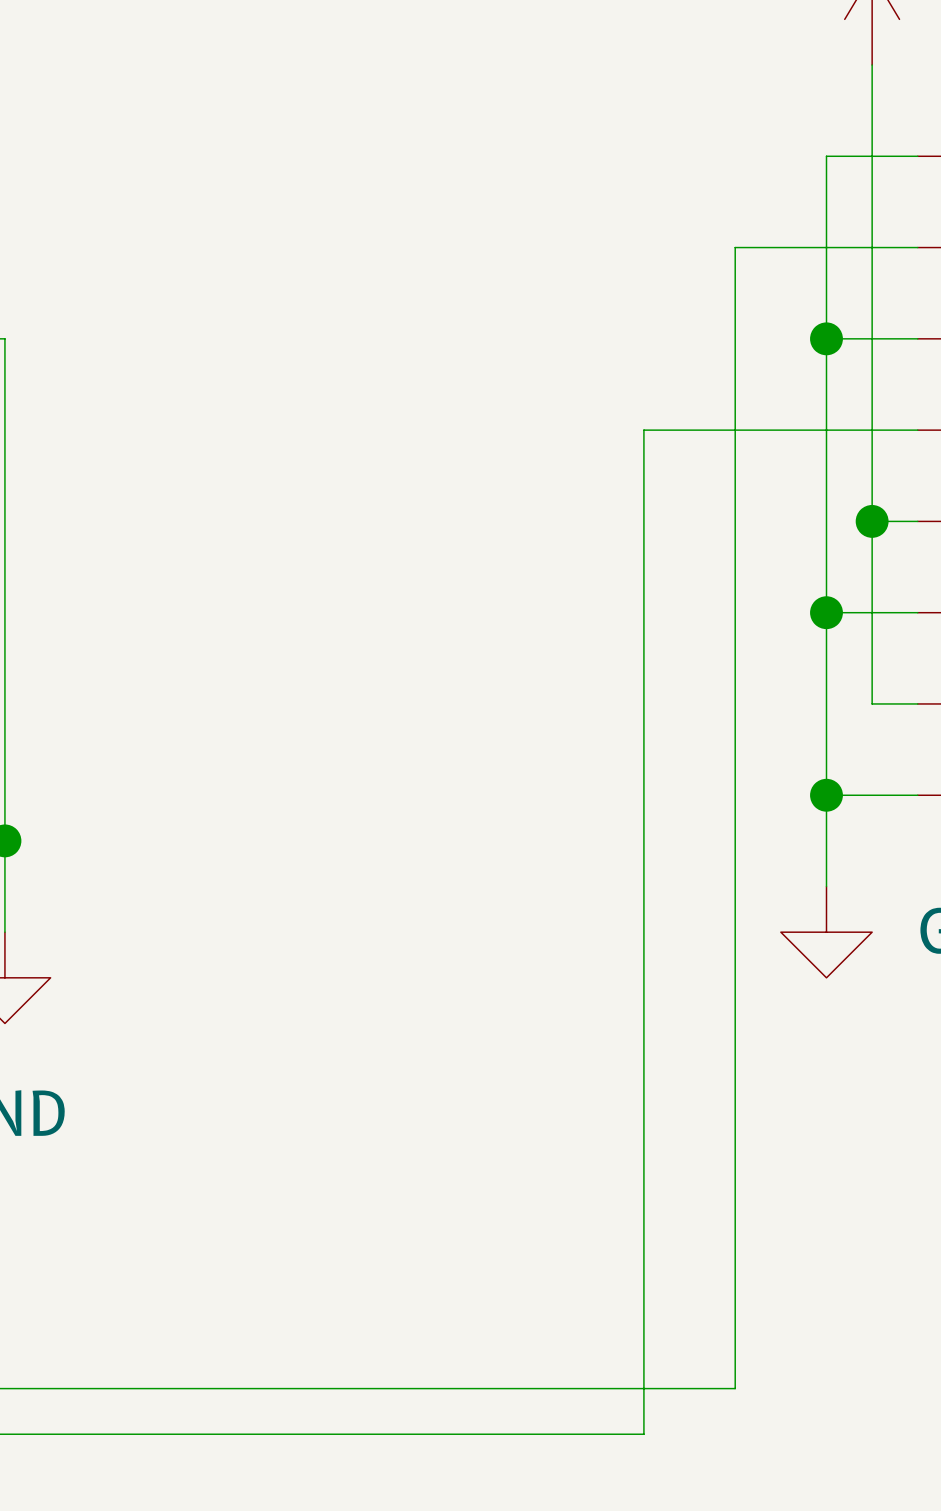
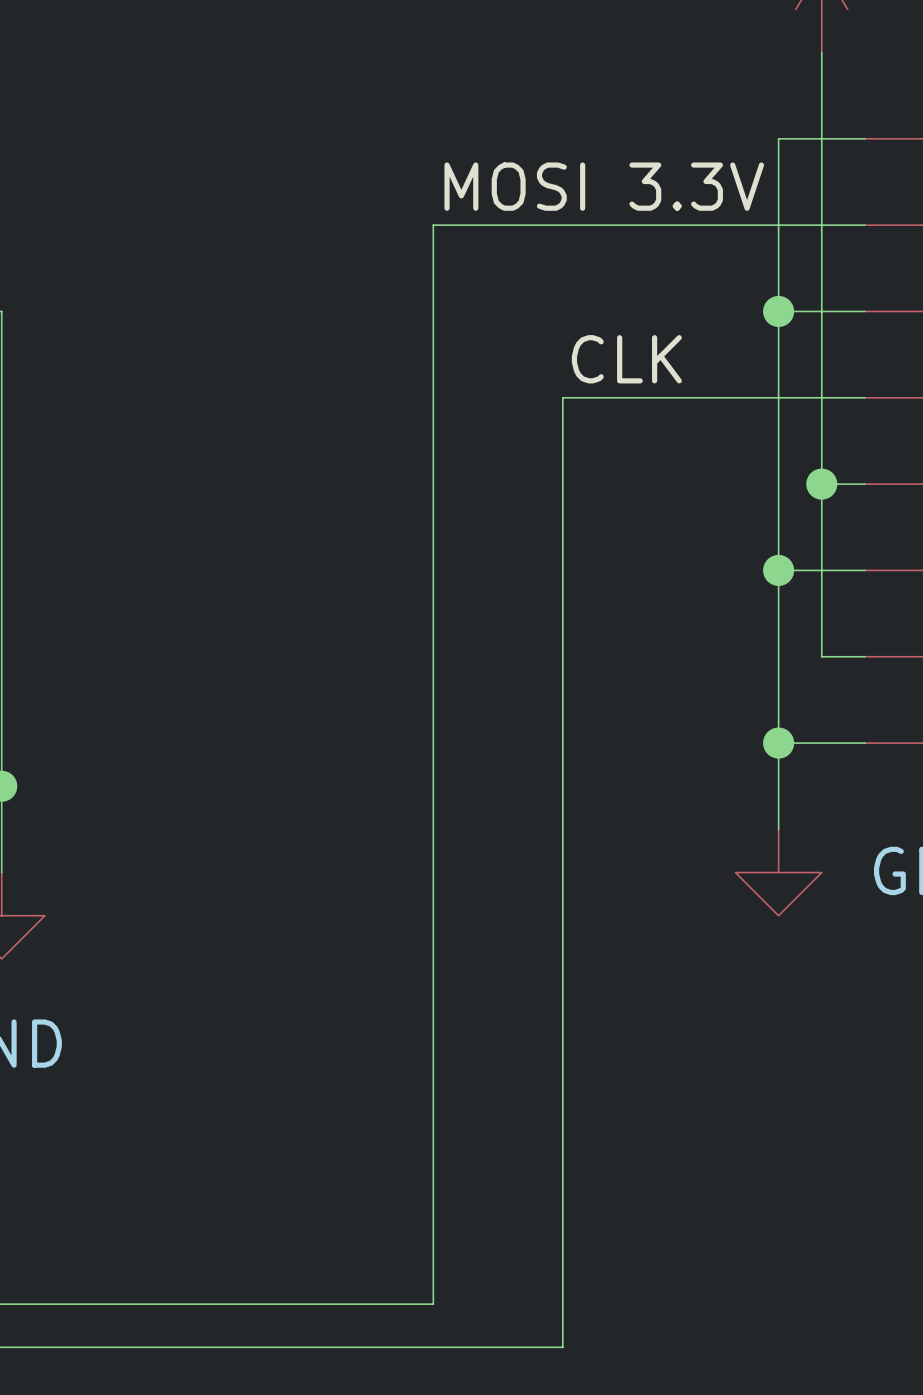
label: none -> MOSI 3.3V (604, 186)
wire: (735, 247) (735, 1388) (461, 1388) -> (692, 225) (433, 225) (433, 1304)
label: none -> CLK (626, 359)
wire: (643, 430) (643, 1434) (598, 1434) -> (605, 397) (562, 397) (562, 1347)

